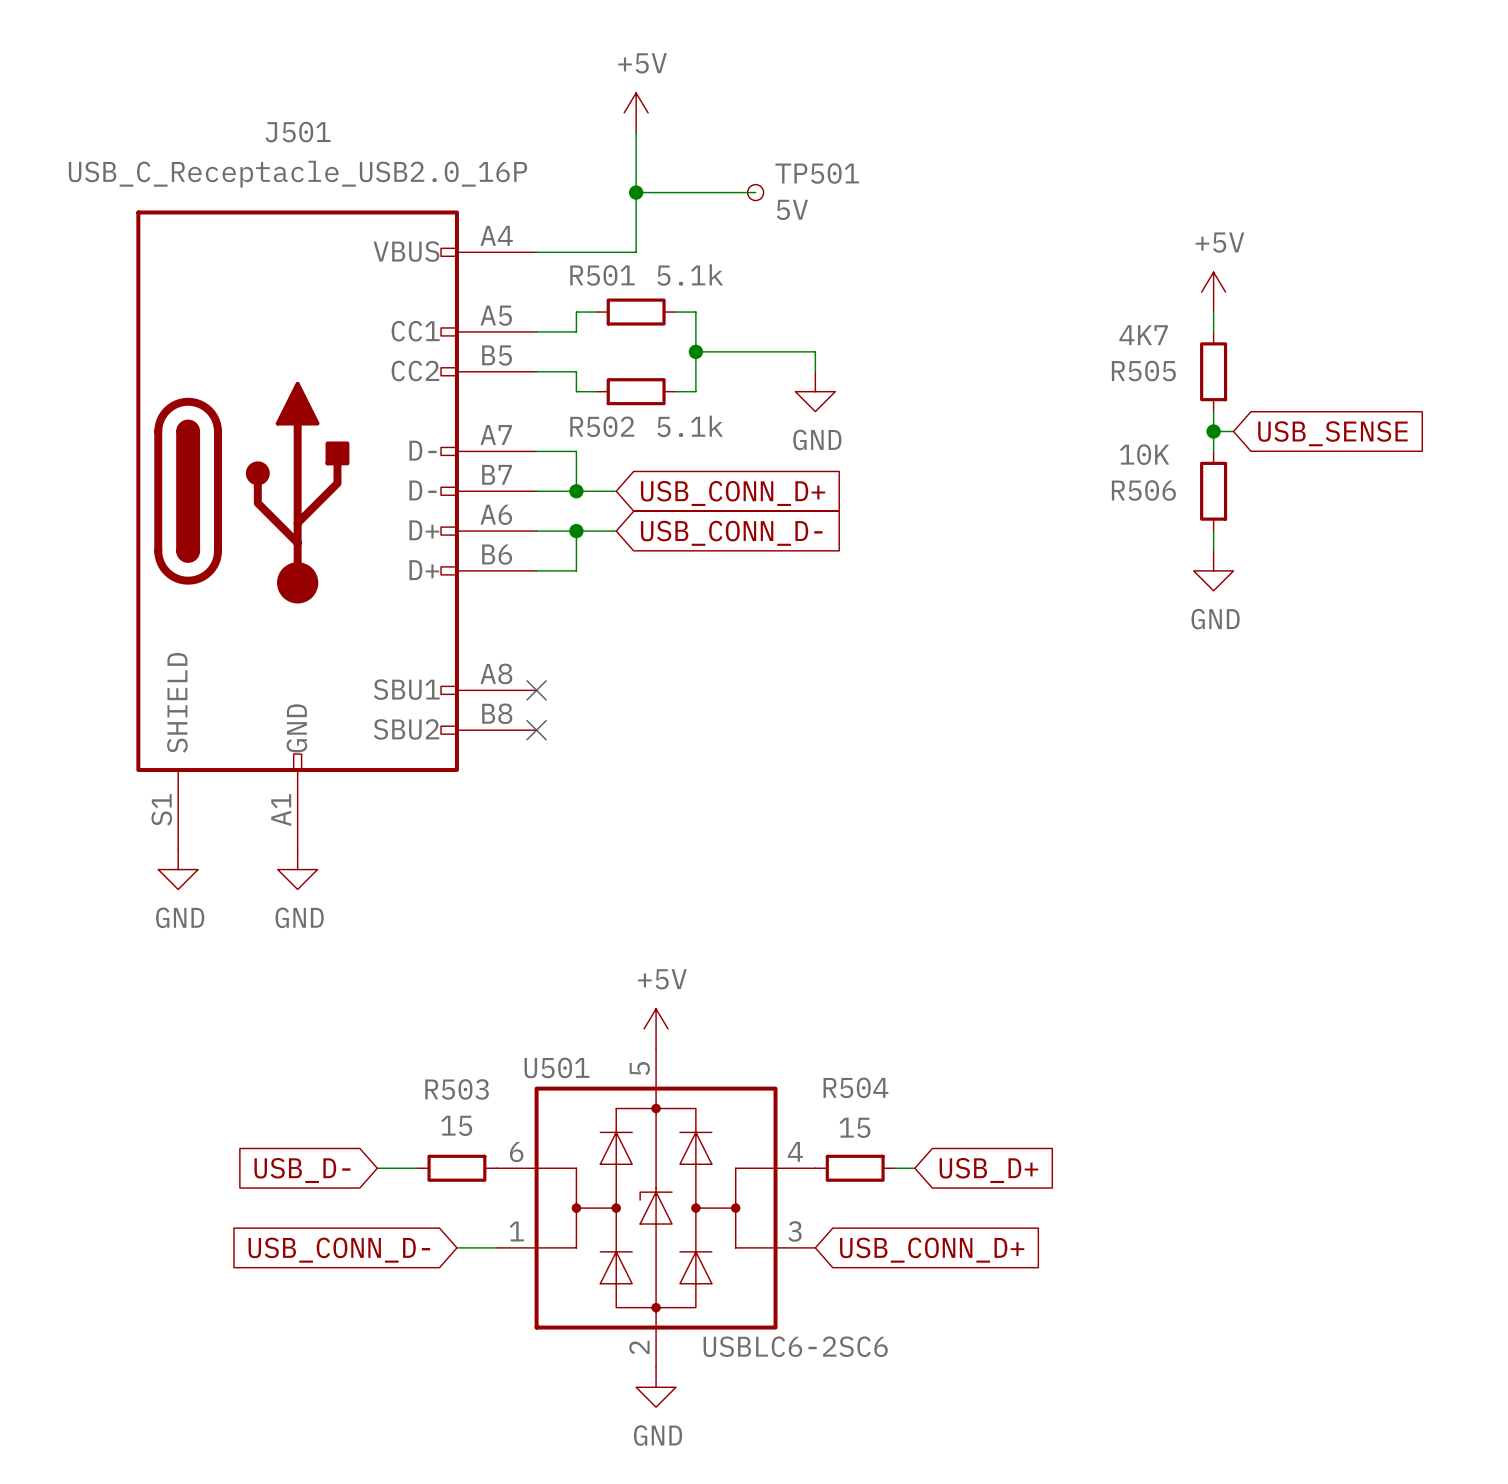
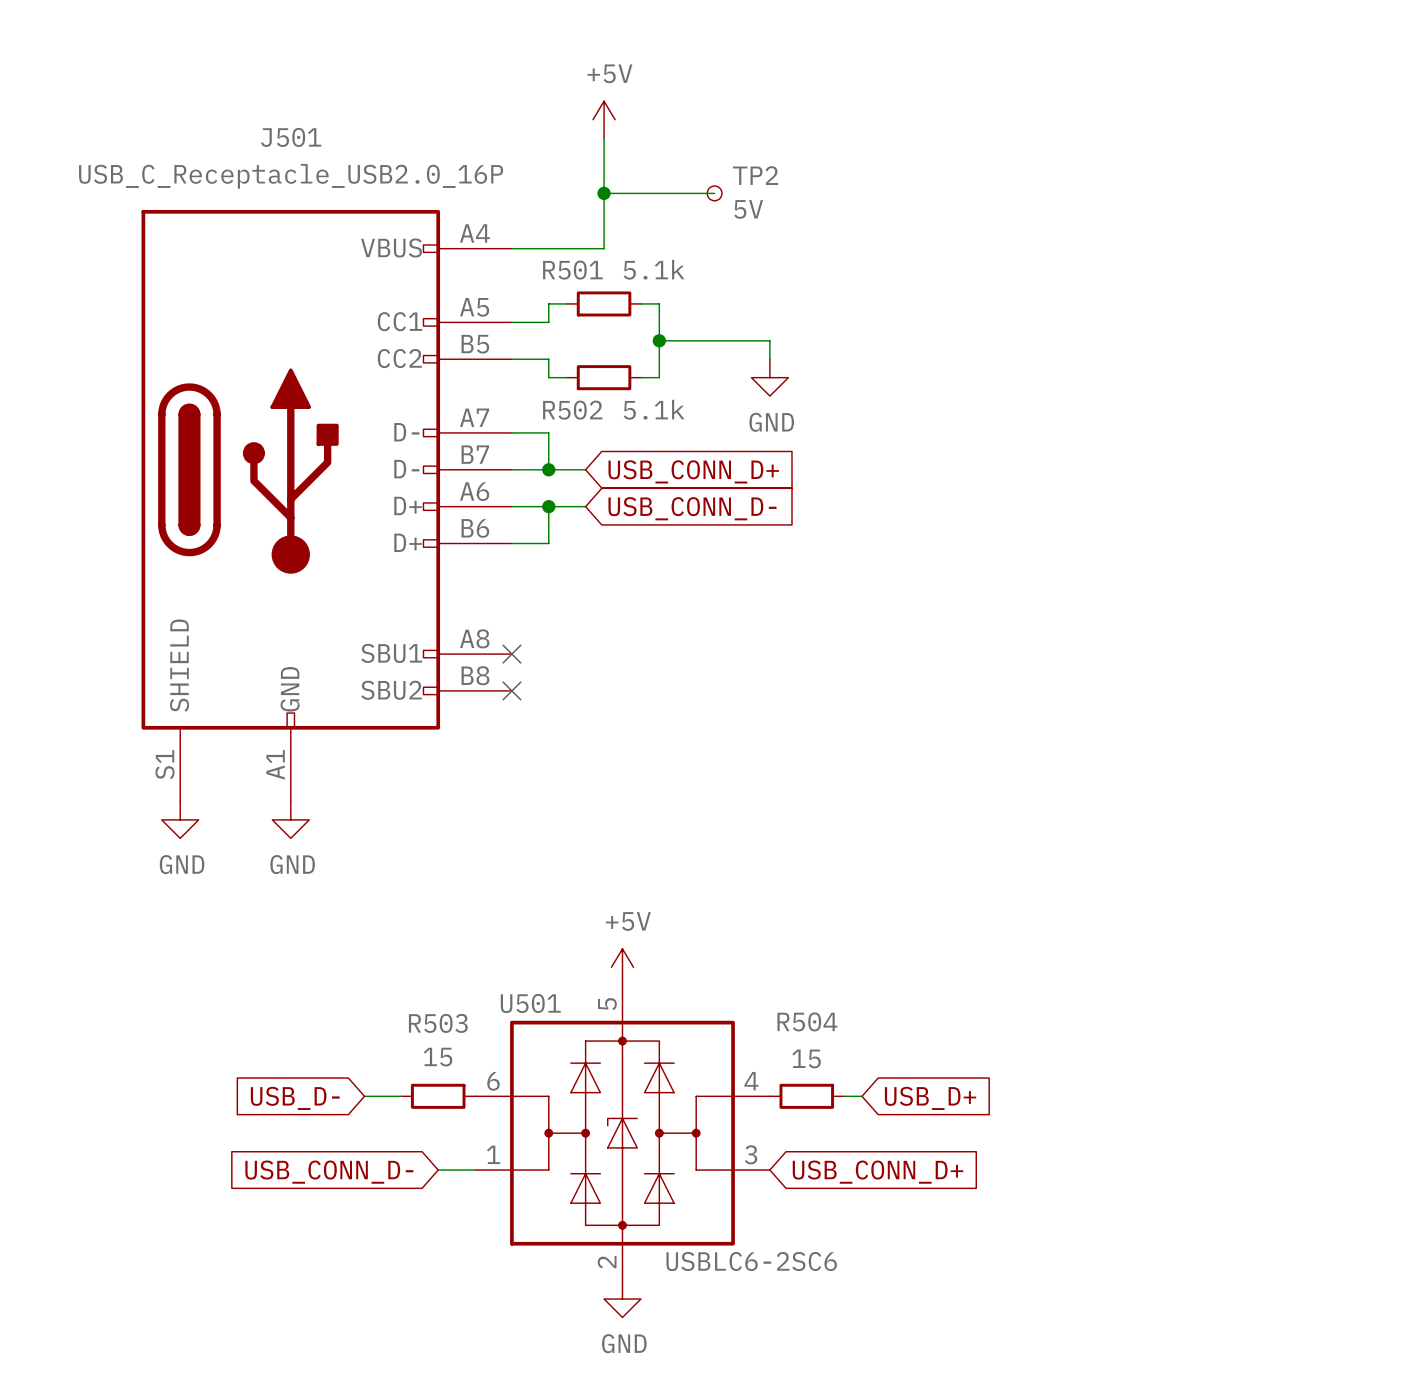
TP501 name: TP501 (817, 173) -> TP2 (755, 175)
power symbol: +5V (1213, 292) -> none
wire: (1213, 312) (1213, 331) -> none
R505: 4K7 (1213, 371) -> none
wire: (1213, 411) (1213, 451) -> none
wire: (1213, 431) (1233, 431) -> none
junction: (1213, 431) -> none
global label: USB_SENSE (1332, 433) -> none
R506: 10K (1213, 491) -> none
wire: (1213, 531) (1213, 550) -> none
power symbol: GND (1213, 570) -> none

